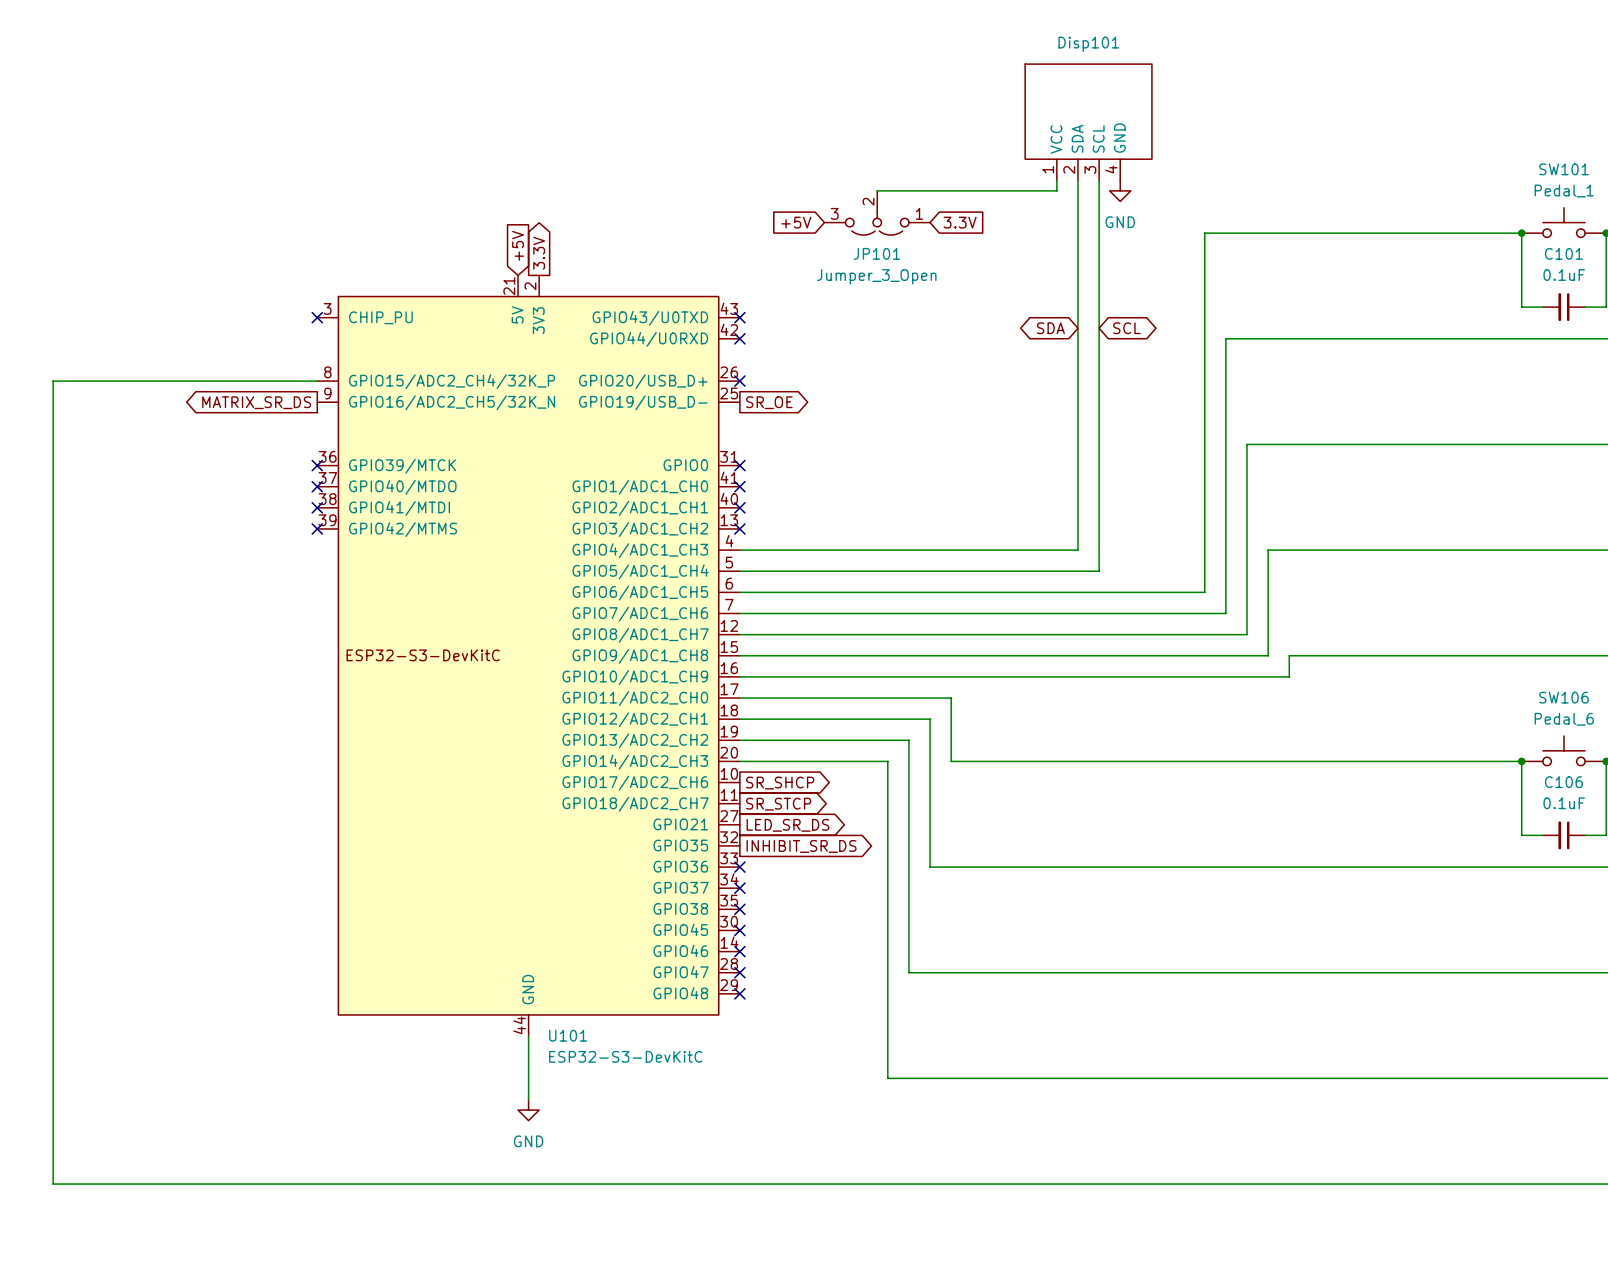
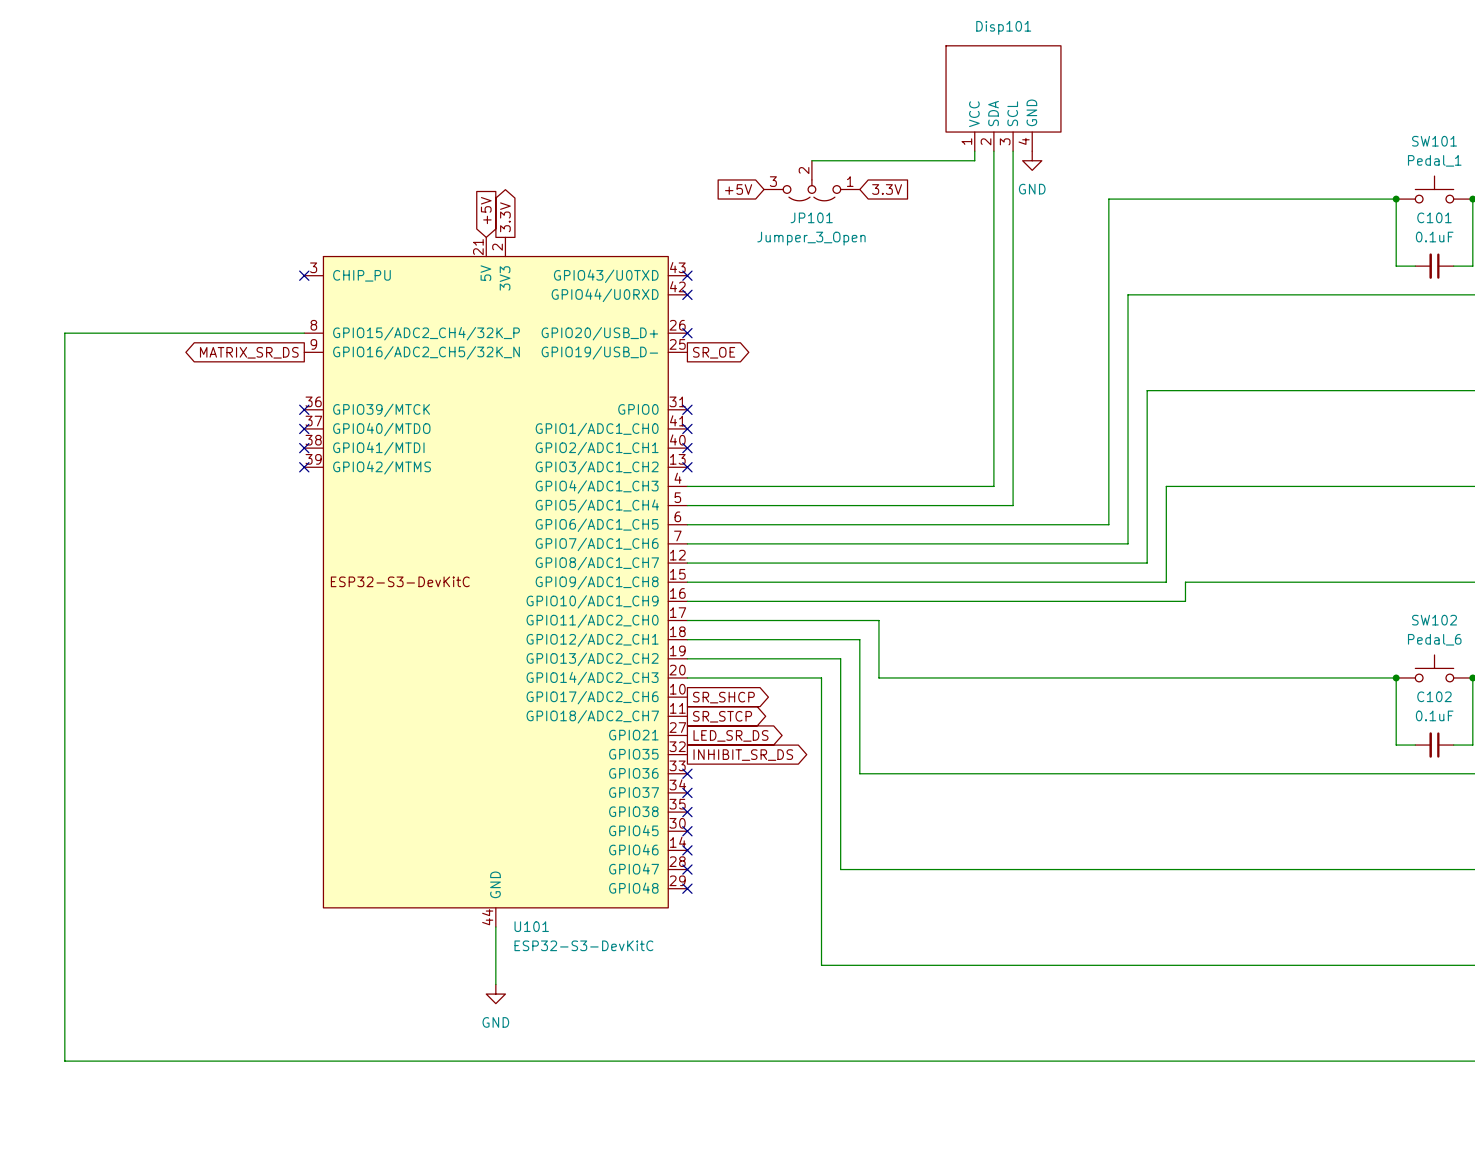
global label: SDA (1050, 328) -> none
global label: SCL (1126, 328) -> none
SW106 name: SW106 (1563, 697) -> SW102 (1434, 620)
C106 name: C106 (1563, 782) -> C102 (1434, 696)

